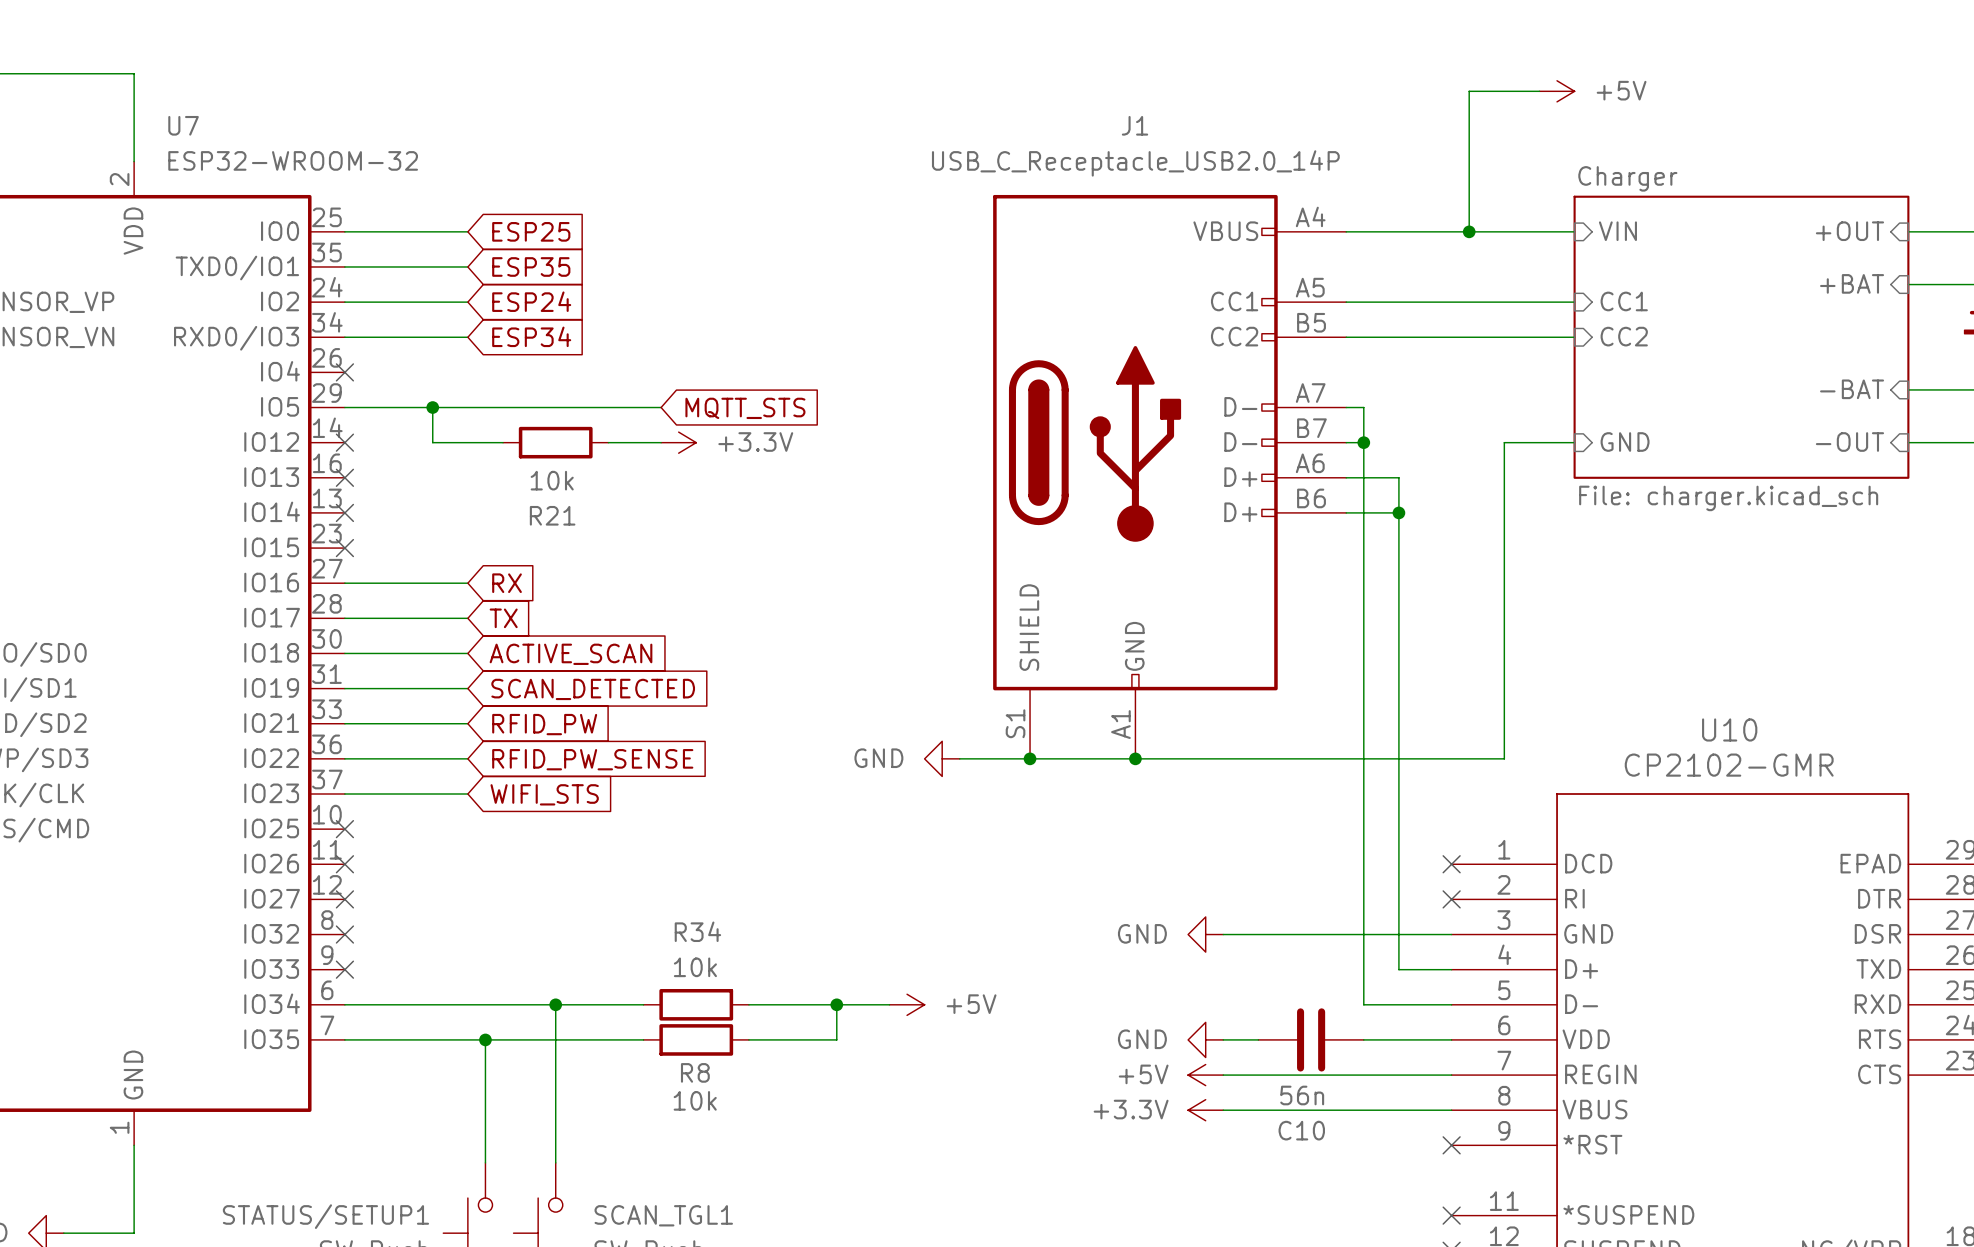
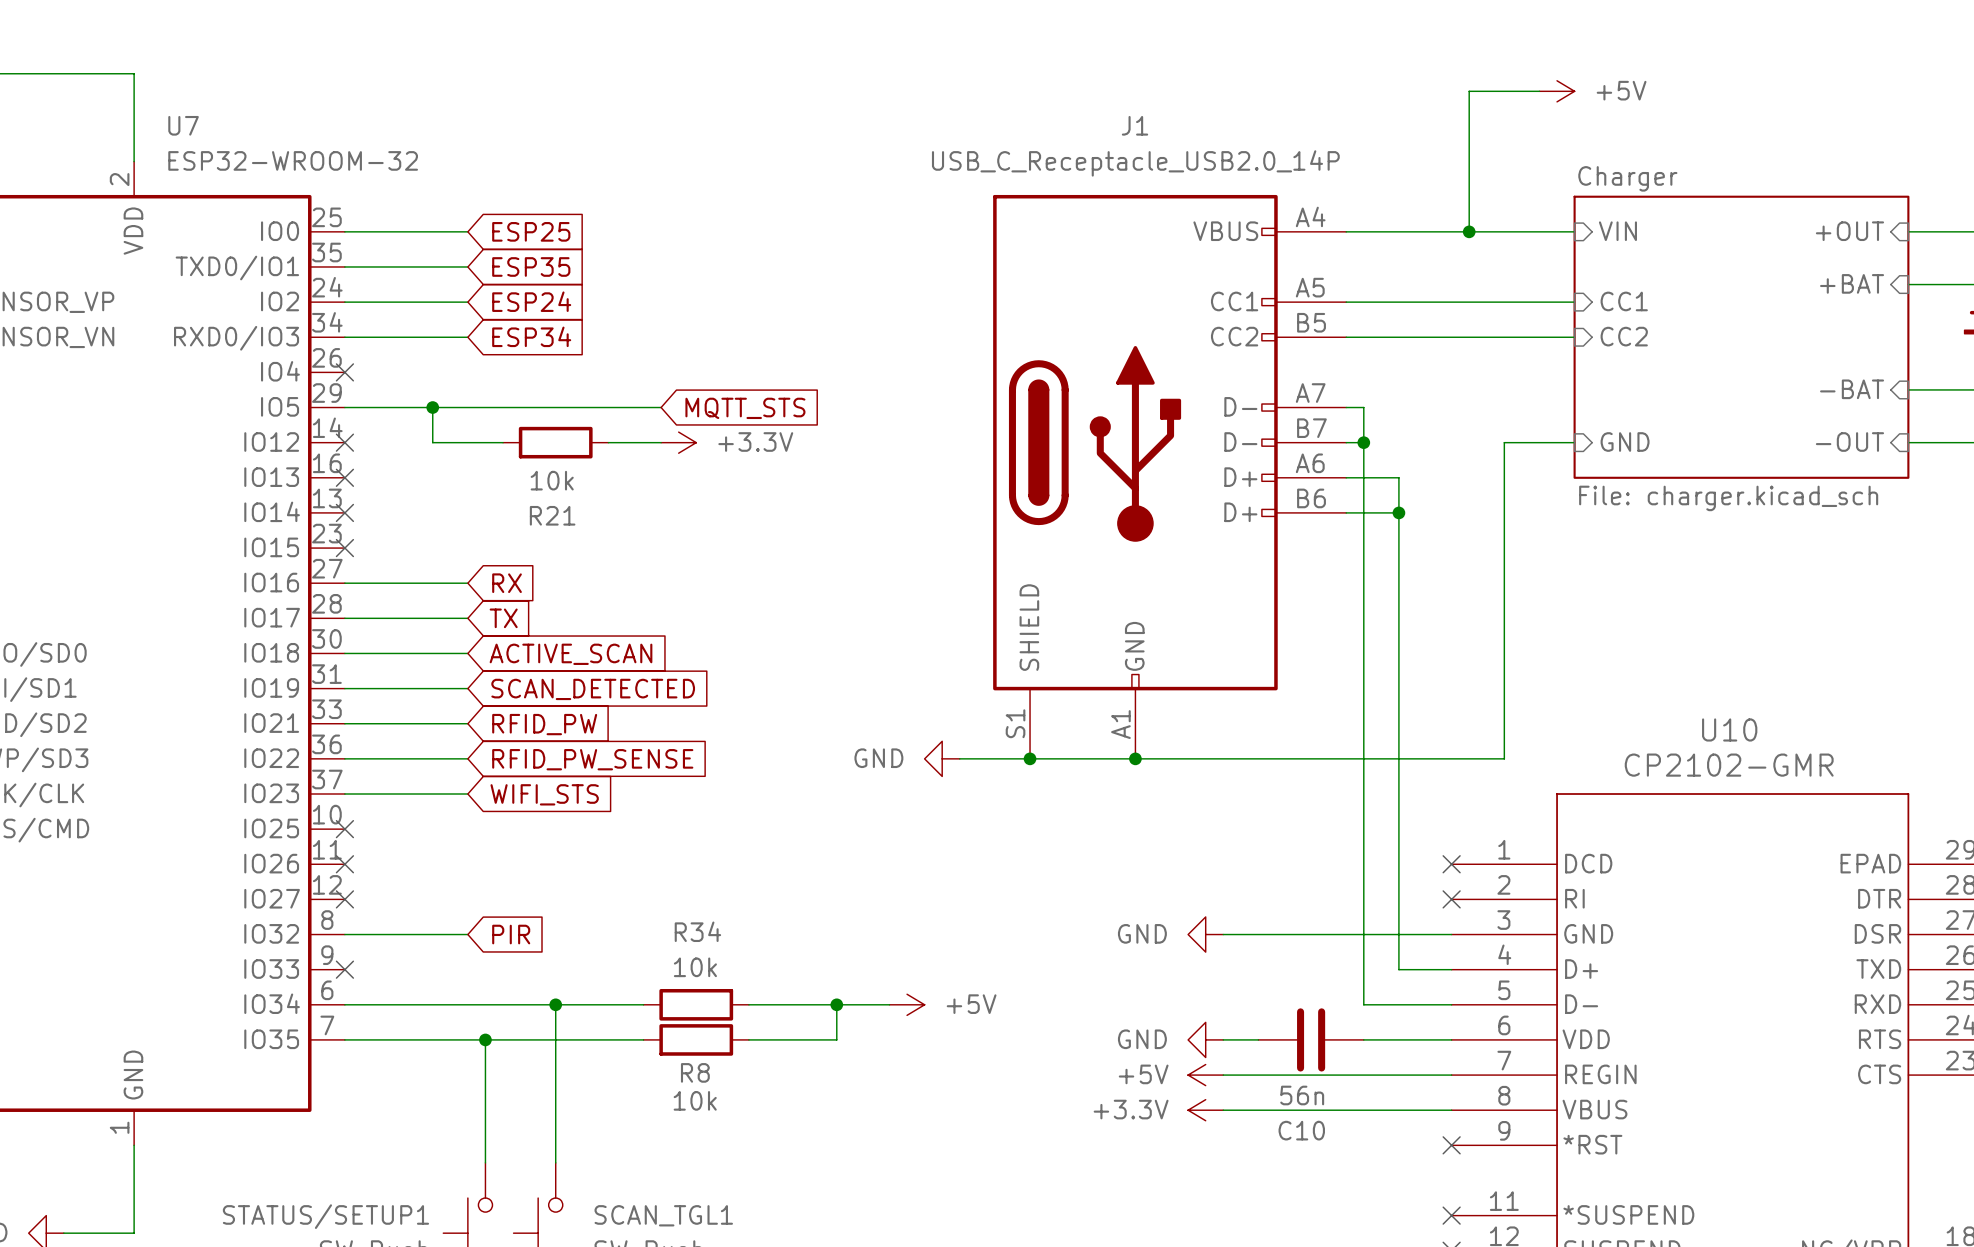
wire: none -> (344, 934) (467, 934)
no-connect mark: (344, 934) -> none
global label: none -> PIR (511, 934)

